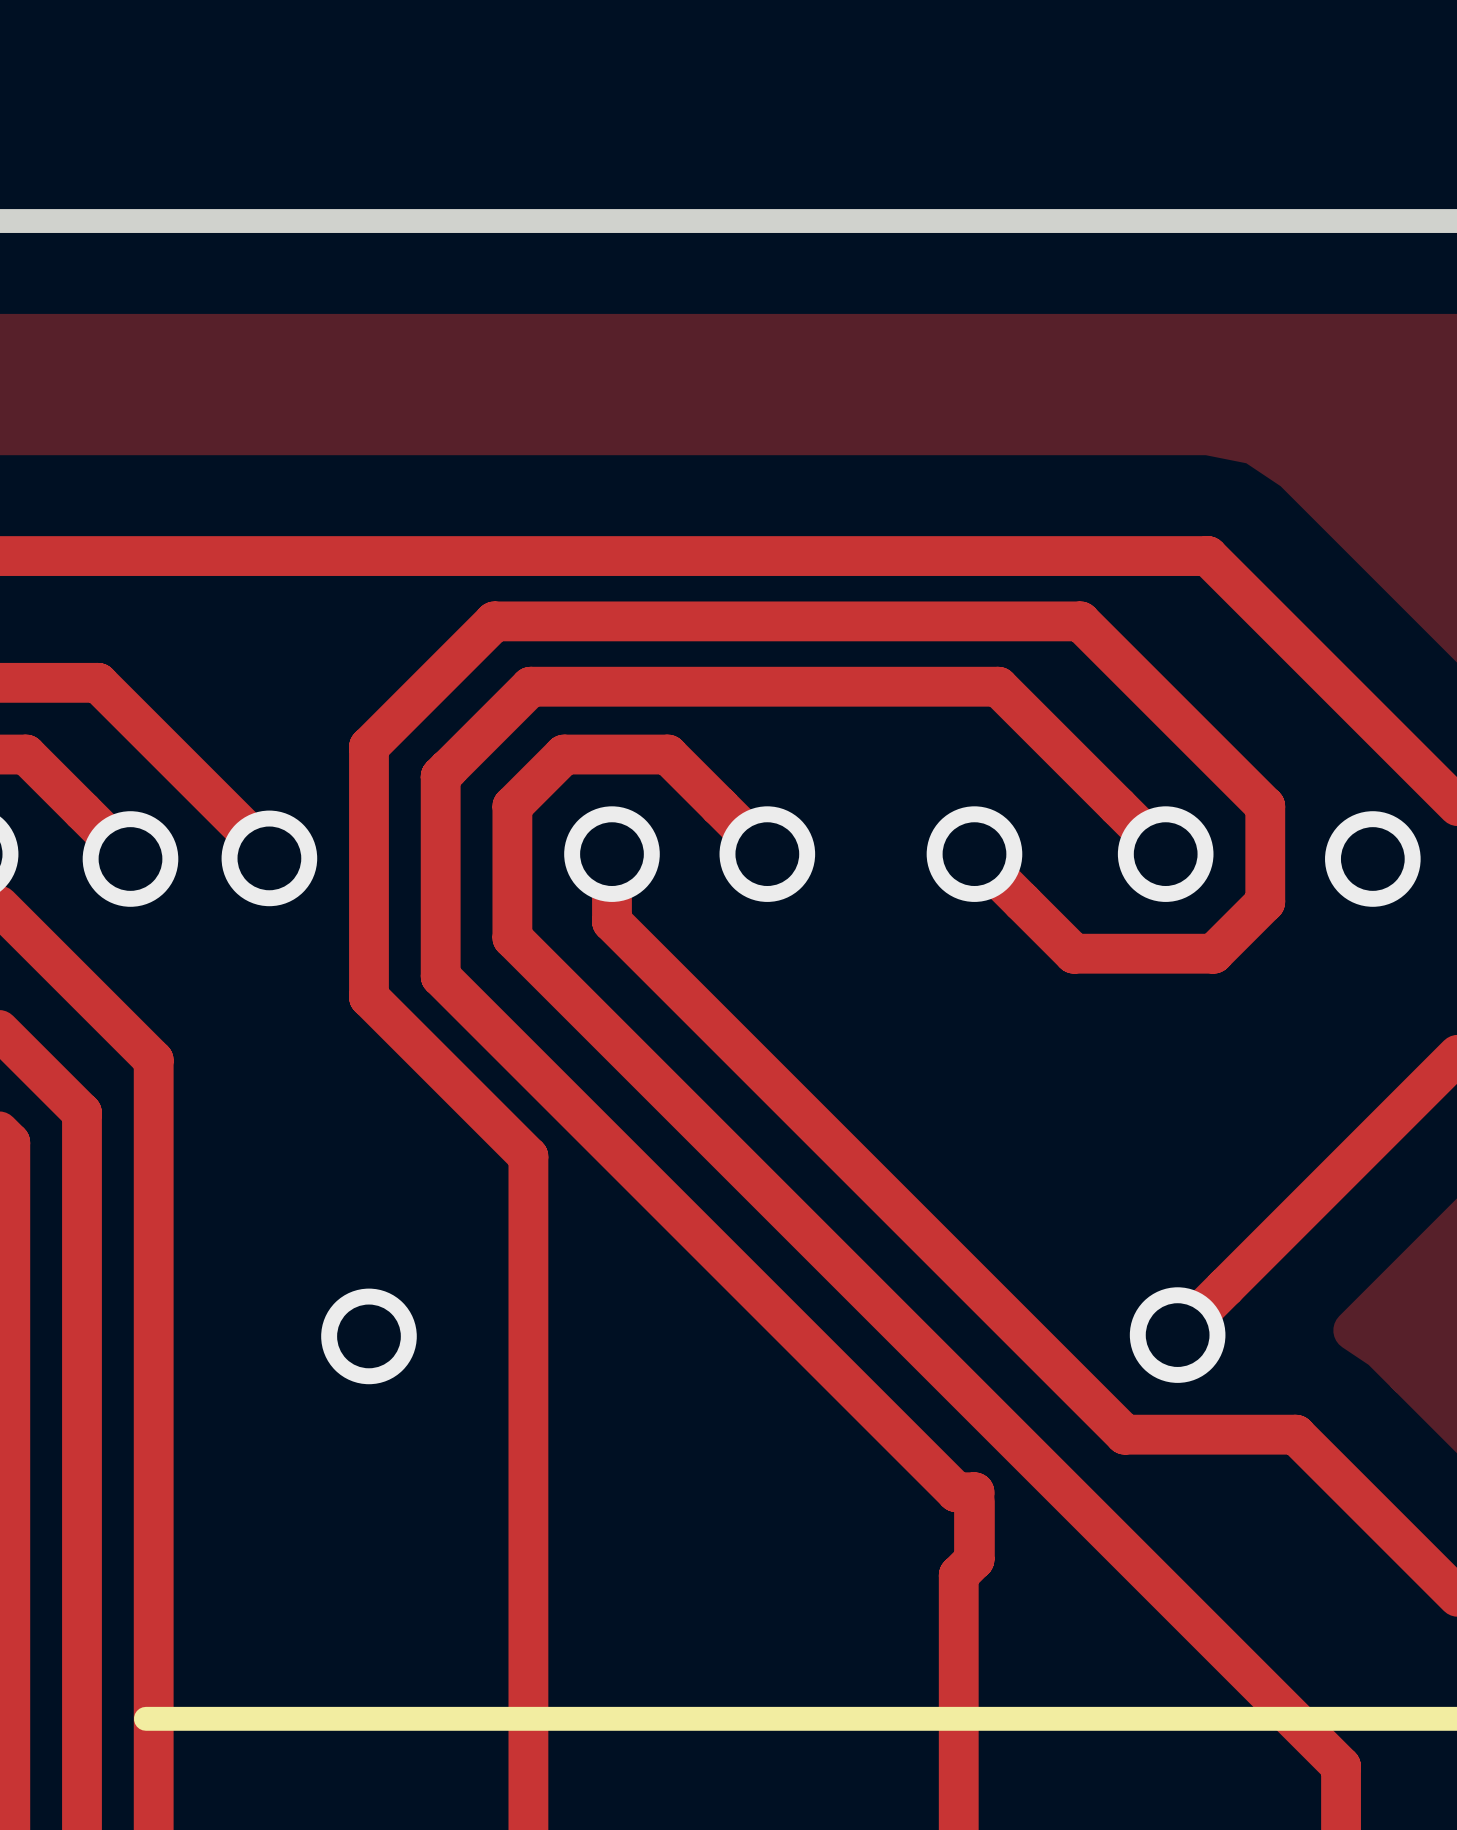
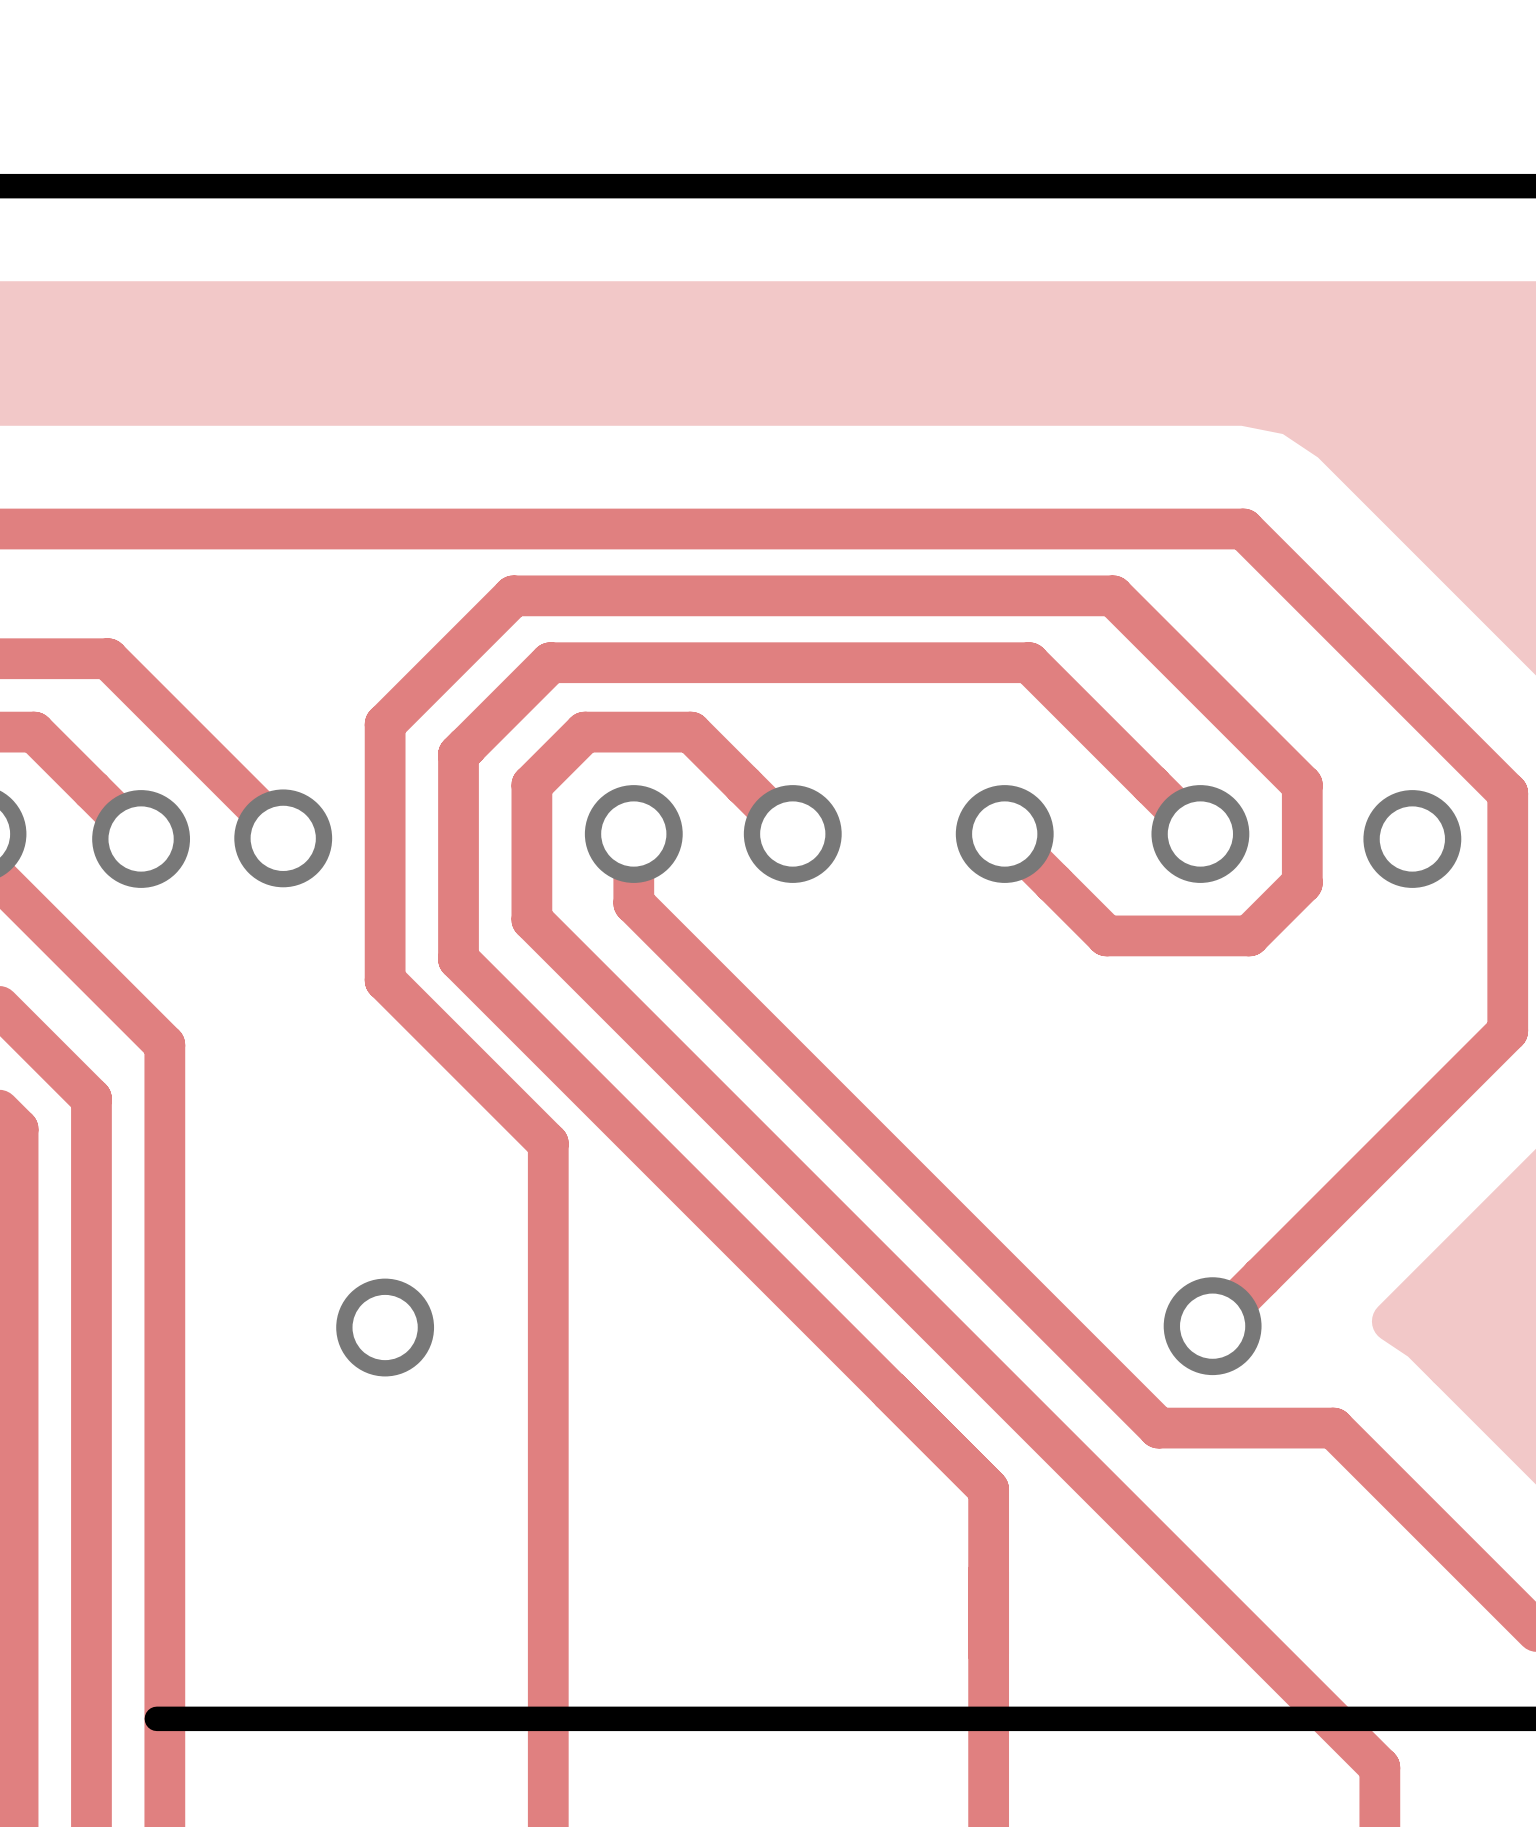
track: (956, 1492) (974, 1492) (974, 1559) (958, 1575) -> (986, 1487) (988, 1489) (988, 1571)

